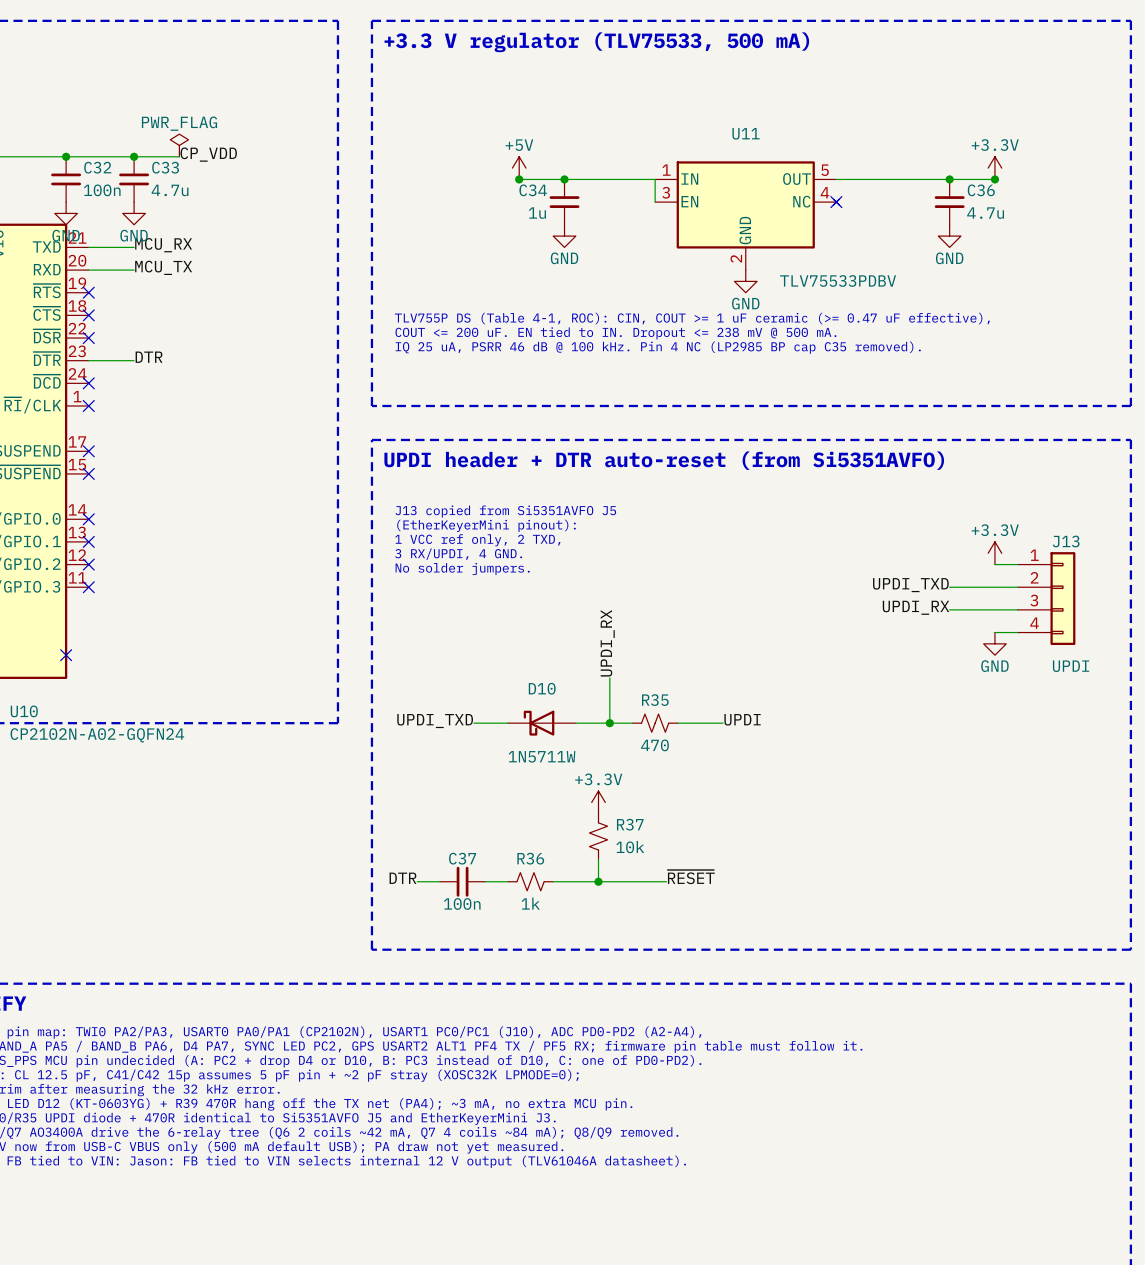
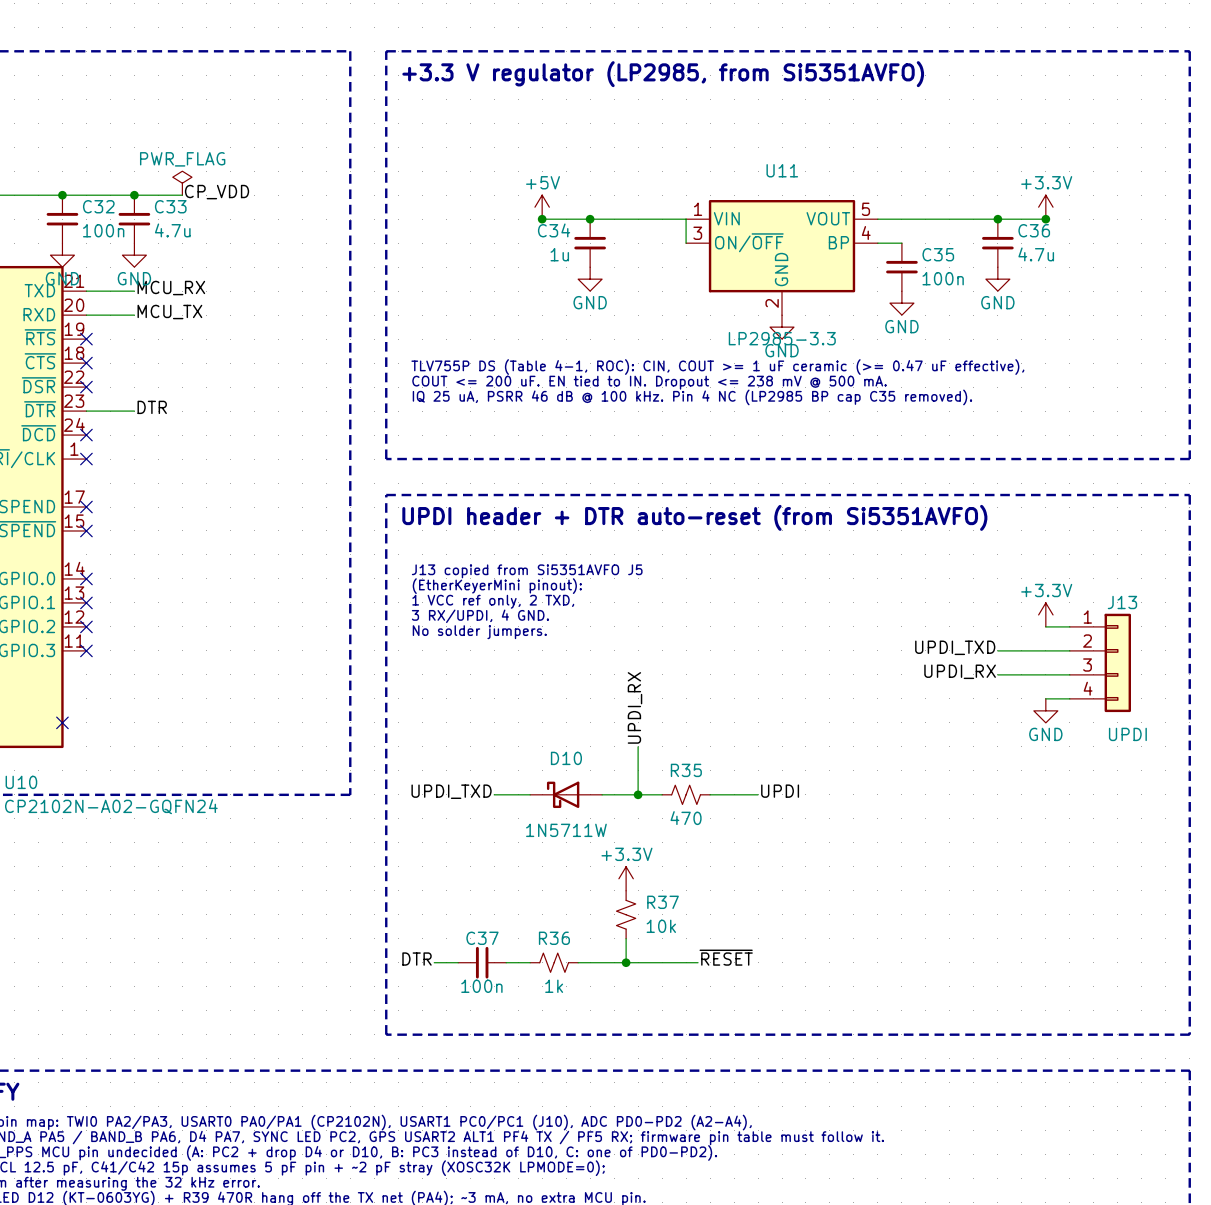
text: +3.3 V regulator (TLV75533, 500 mA) (596, 42) -> +3.3 V regulator (LP2985, from Si5351AVFO) (663, 74)
U11 symbol: [655, 161, 840, 271] -> [686, 200, 878, 316]
wire: none -> (877, 243) (901, 243)
no-connect mark: (836, 202) -> none
C35: none -> 100n (901, 267)
power symbol: none -> GND (901, 303)
U11 value: TLV75533PDBV (838, 280) -> LP2985-3.3 (782, 338)

